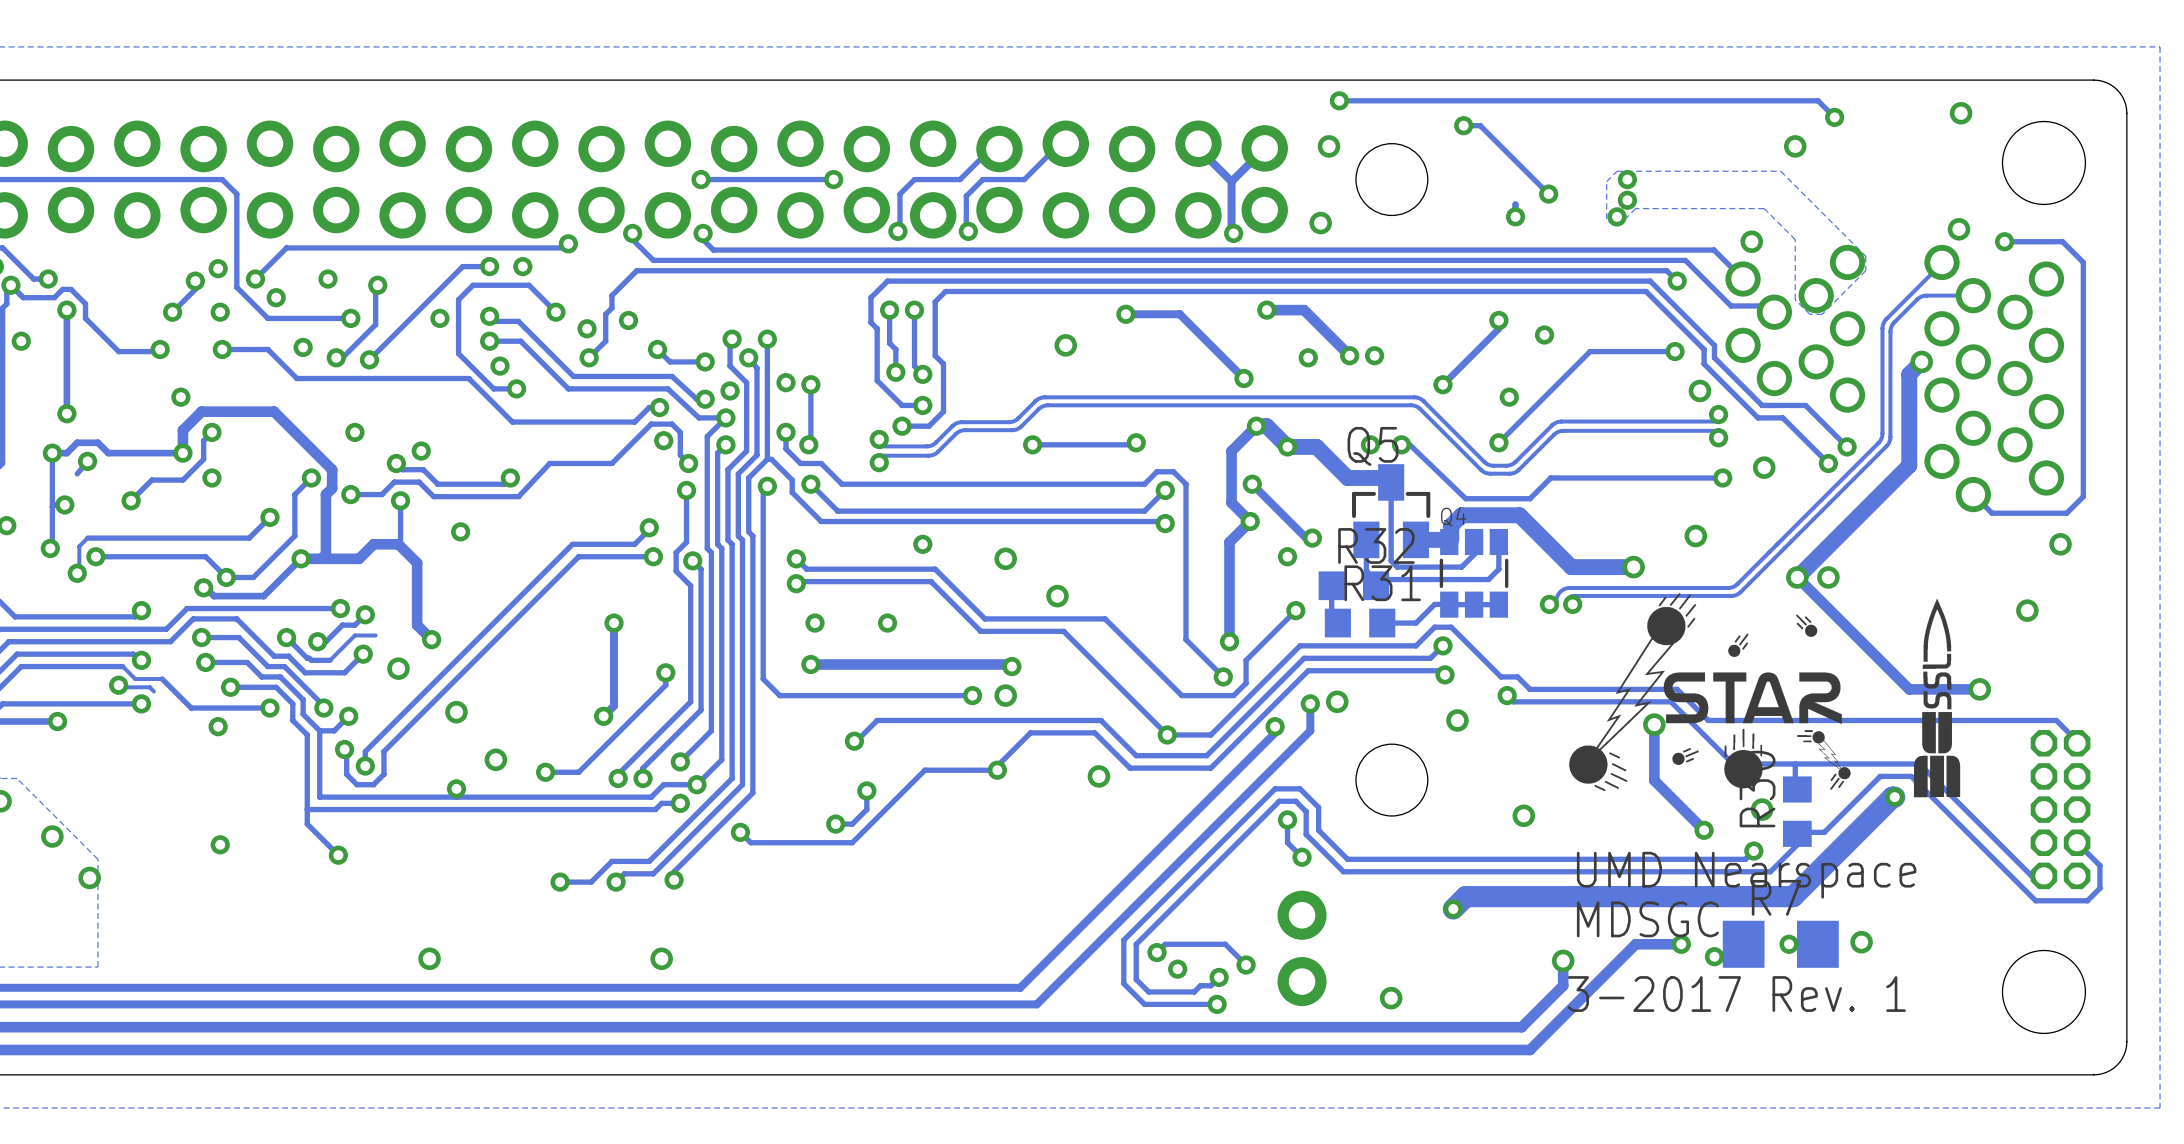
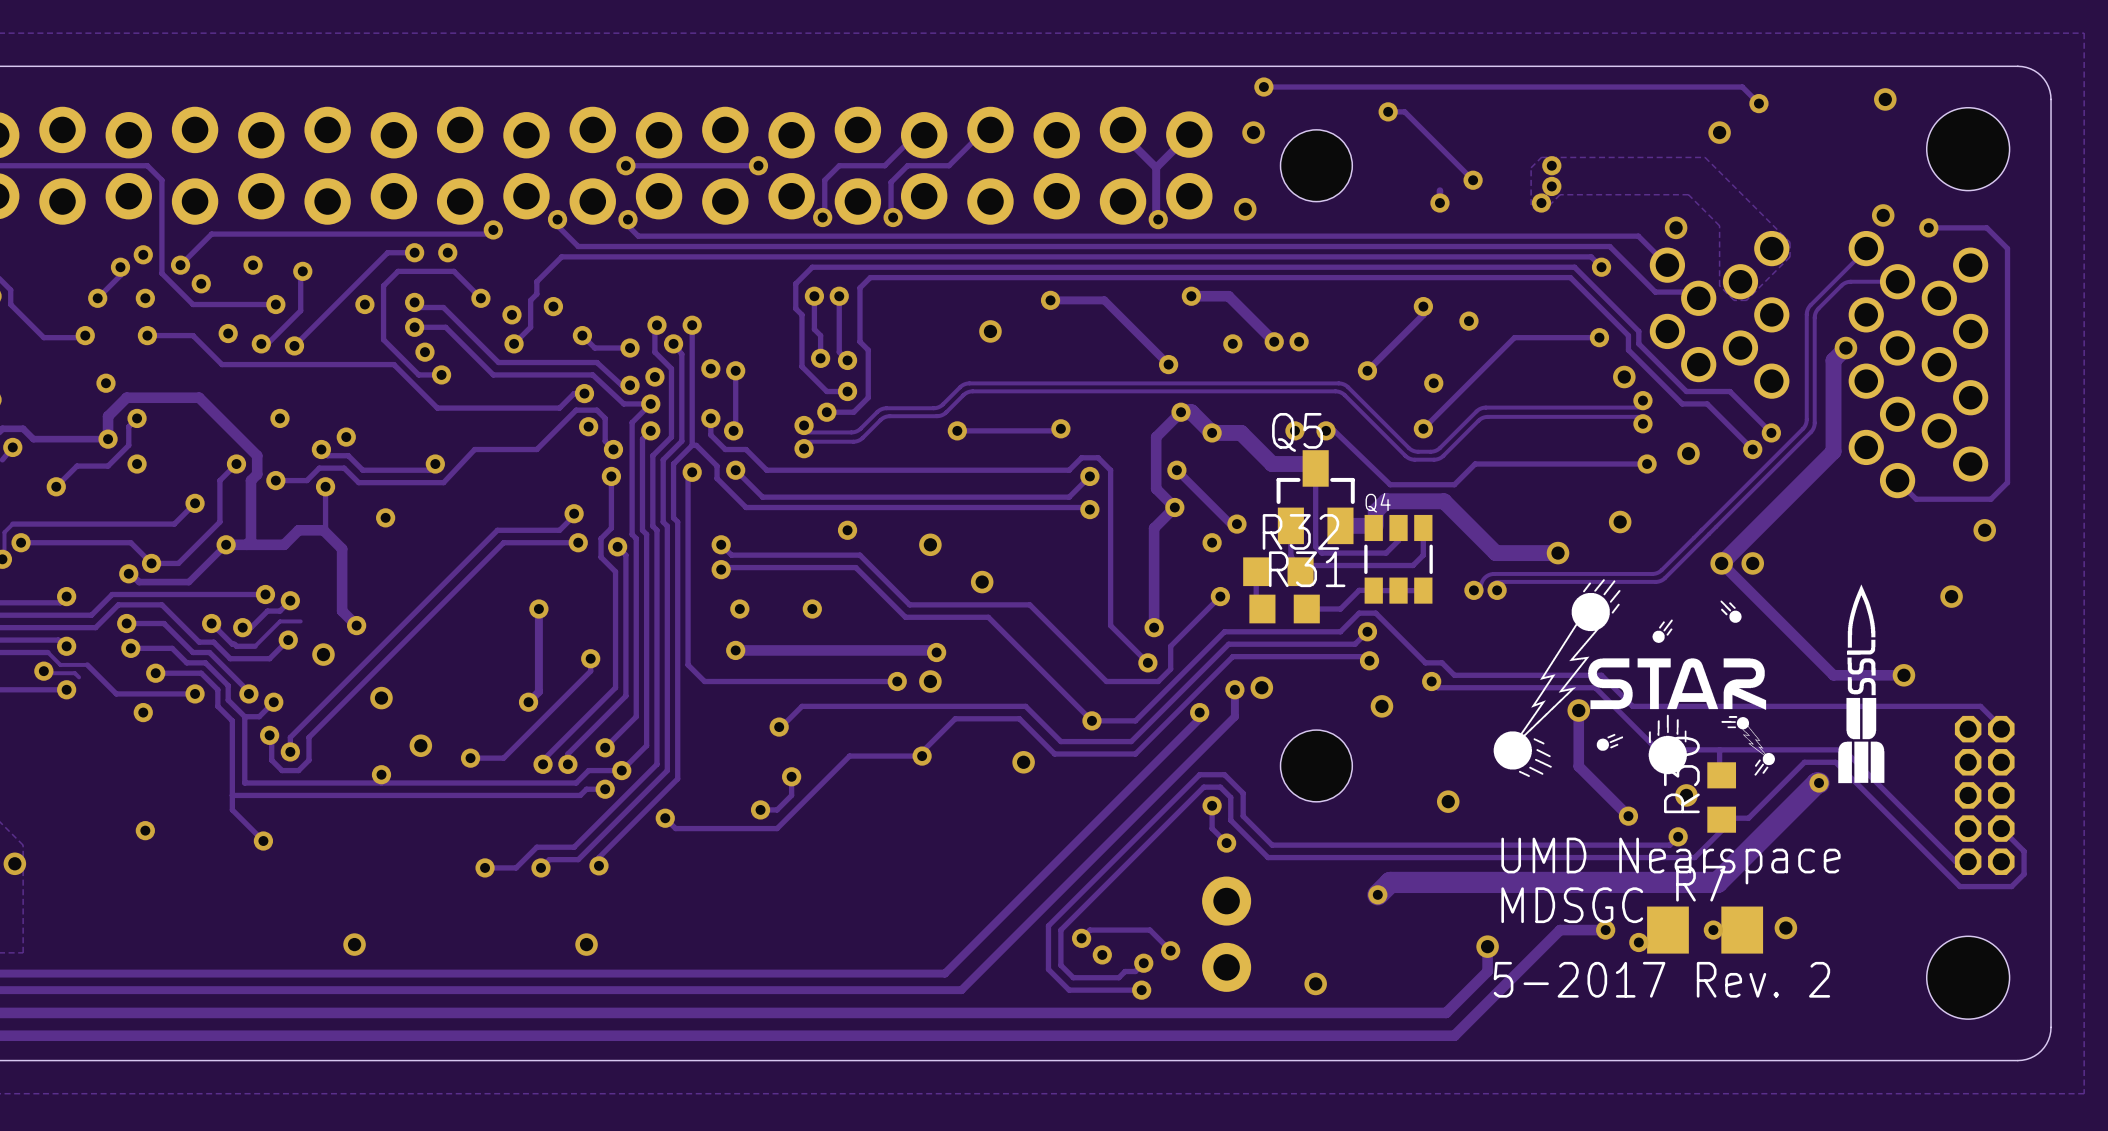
text: 3-2017 Rev. 1 (1736, 994) -> 5-2017 Rev. 2 (1661, 979)

